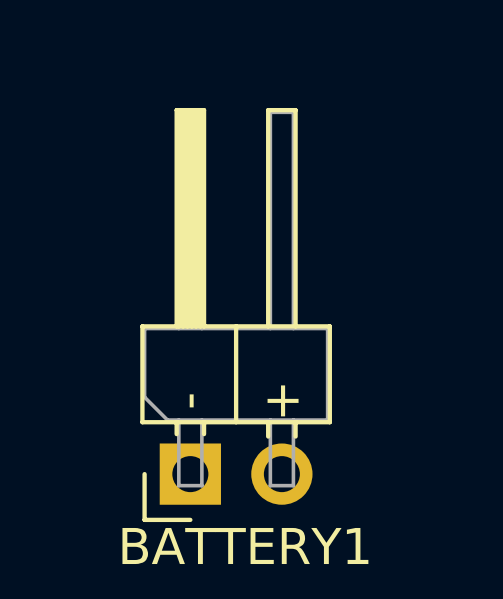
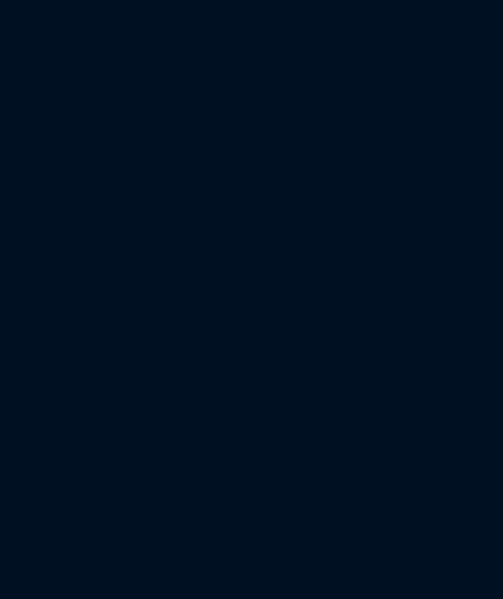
BATTERY1: (236, 315) -> none

